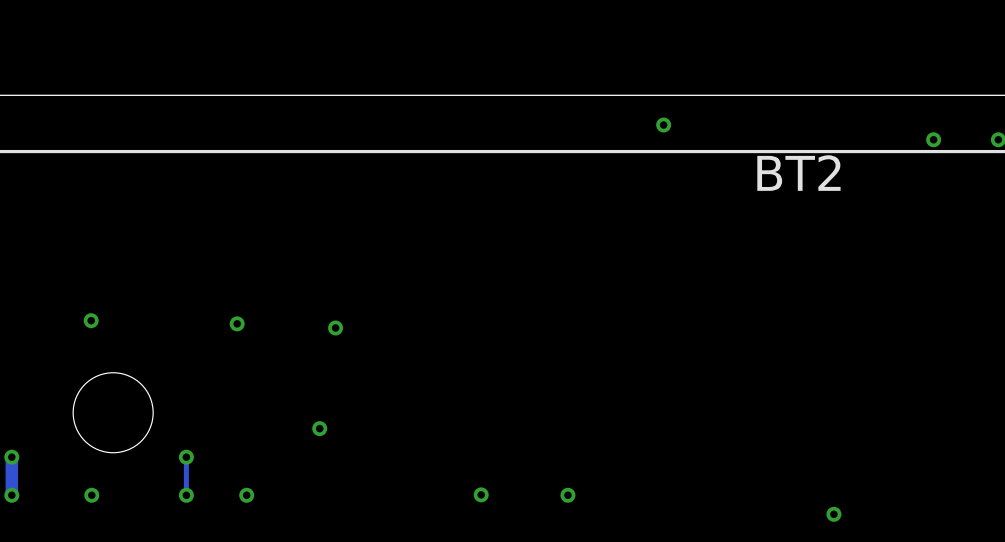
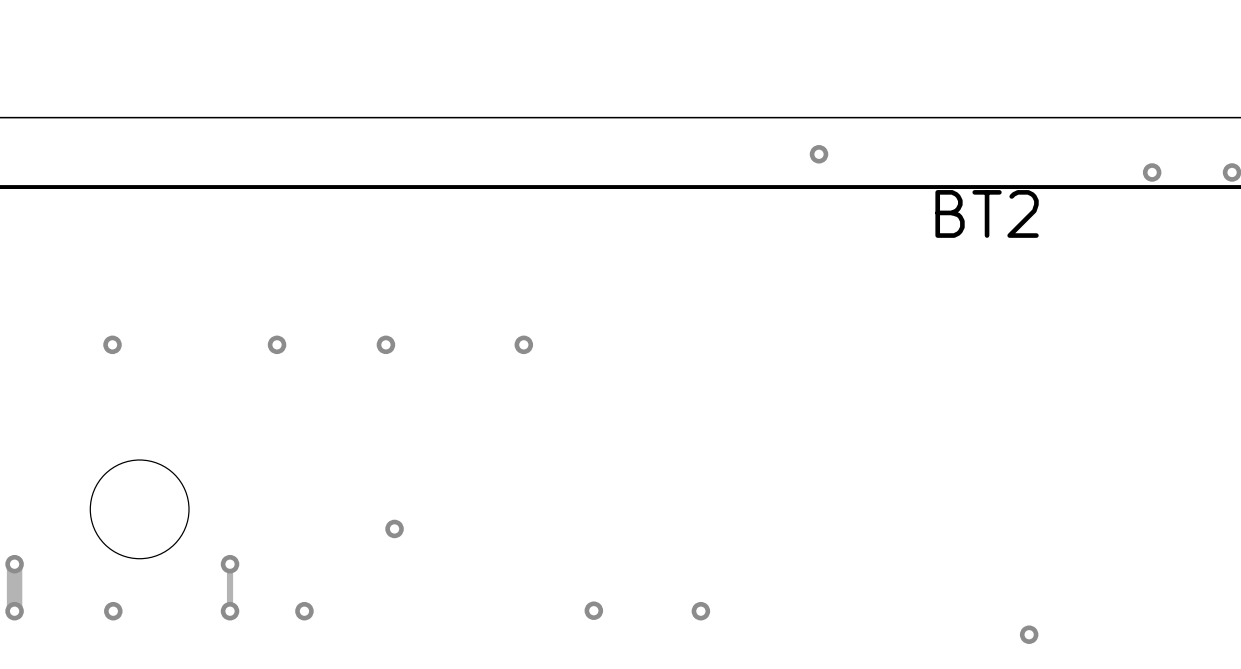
via: none -> (277, 344)
via: none -> (385, 344)
via: none -> (523, 344)
via position: (91, 320) -> (112, 344)
via: (237, 323) -> none
via: (335, 327) -> none

